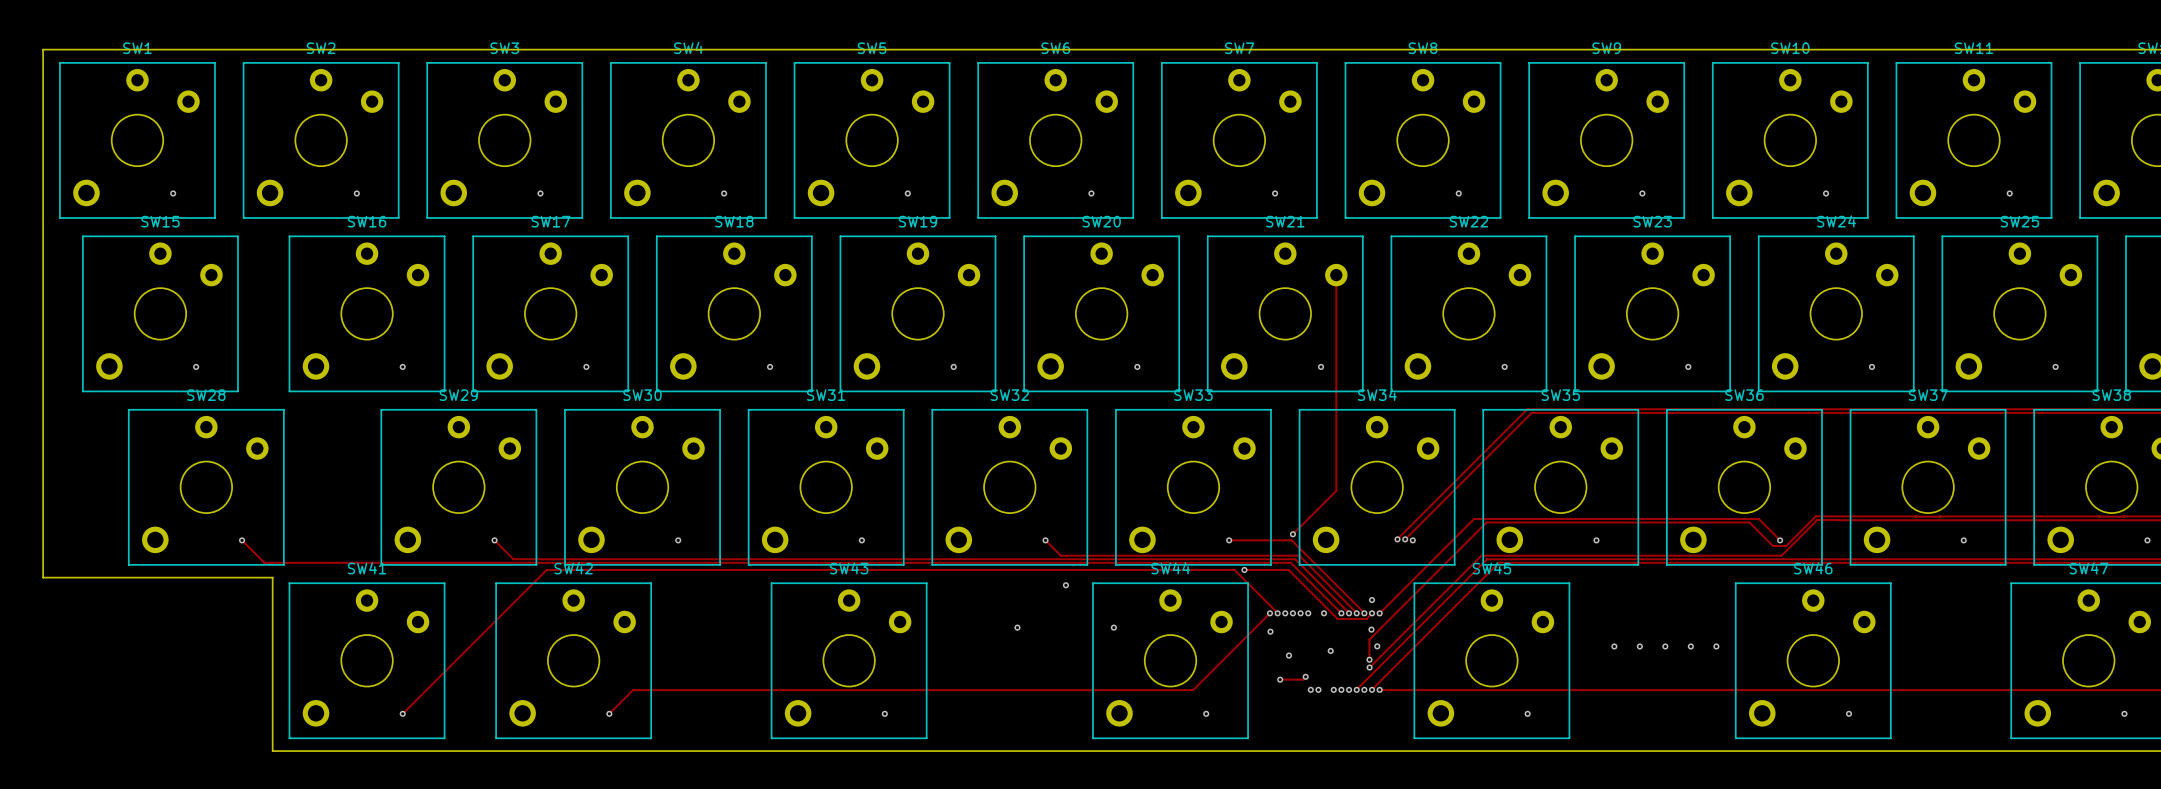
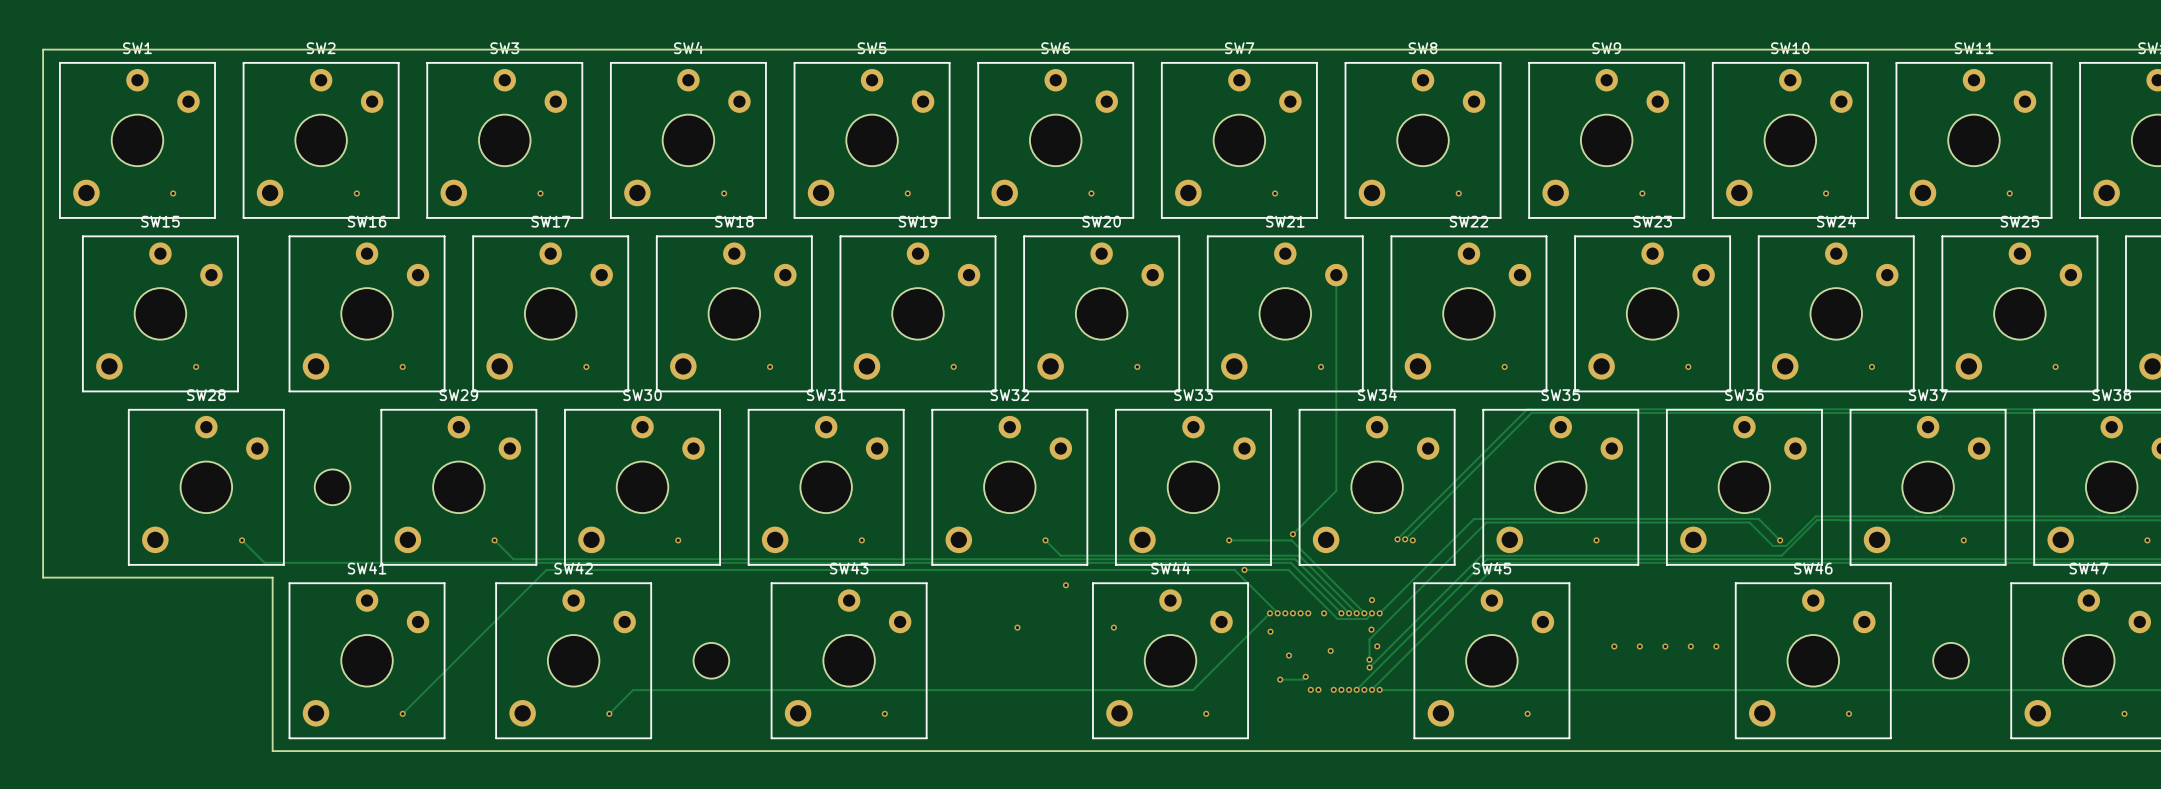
part: none -> (332, 487)
part: none -> (711, 660)
part: none -> (1951, 660)

